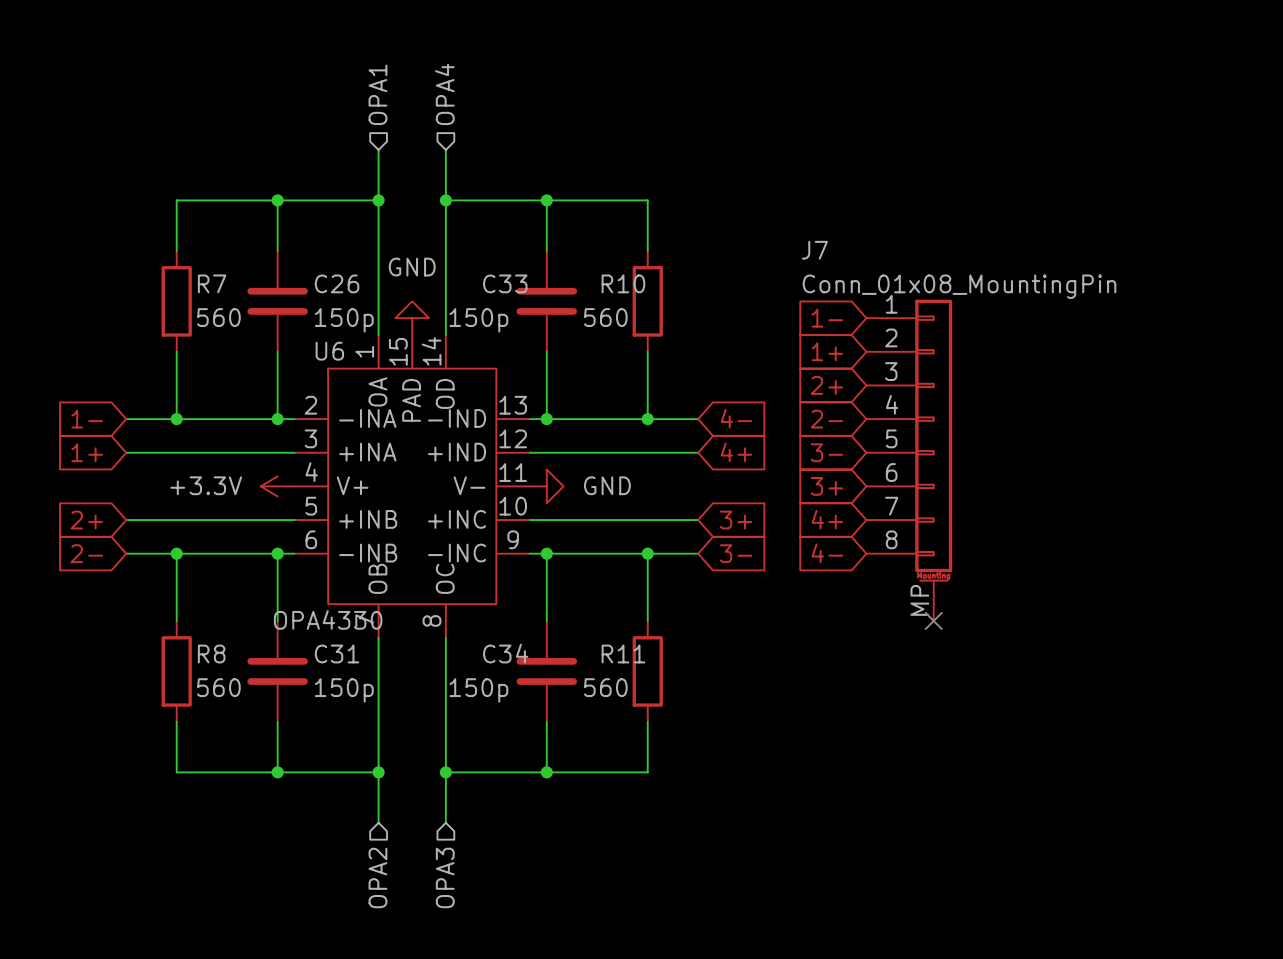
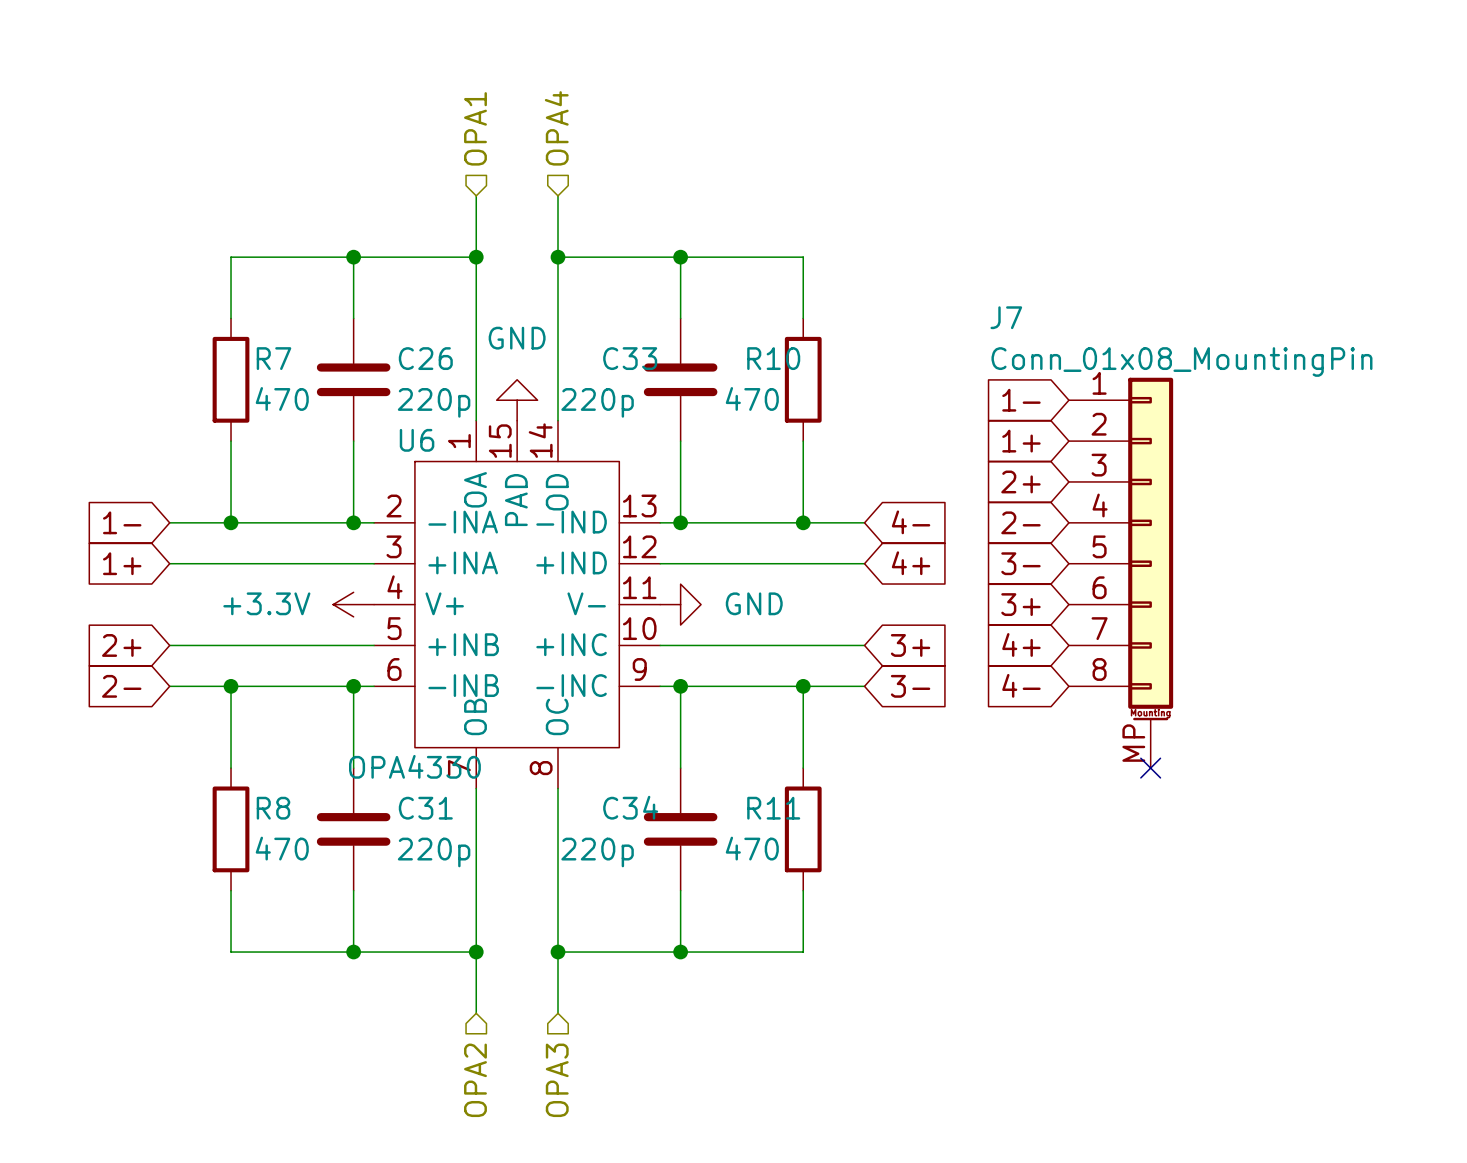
R7 value: 560 (218, 317) -> 470 (282, 398)
R10 value: 560 (605, 317) -> 470 (752, 398)
C26 value: 150p (344, 320) -> 220p (434, 402)
C33 value: 150p (478, 320) -> 220p (597, 402)
R8 value: 560 (218, 687) -> 470 (282, 848)
R11 value: 560 (605, 687) -> 470 (752, 848)
C31 value: 150p (344, 690) -> 220p (434, 852)
C34 value: 150p (478, 690) -> 220p (597, 852)

